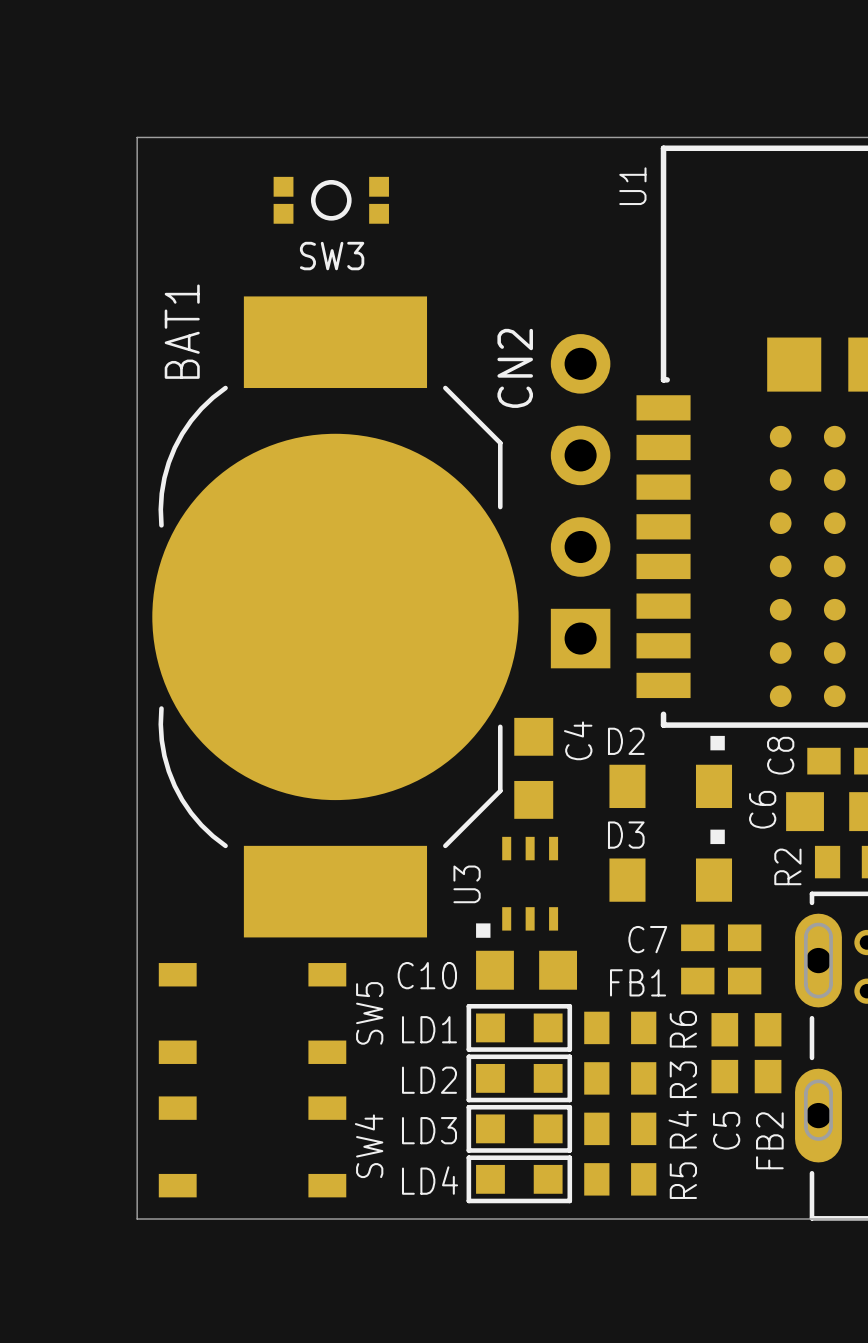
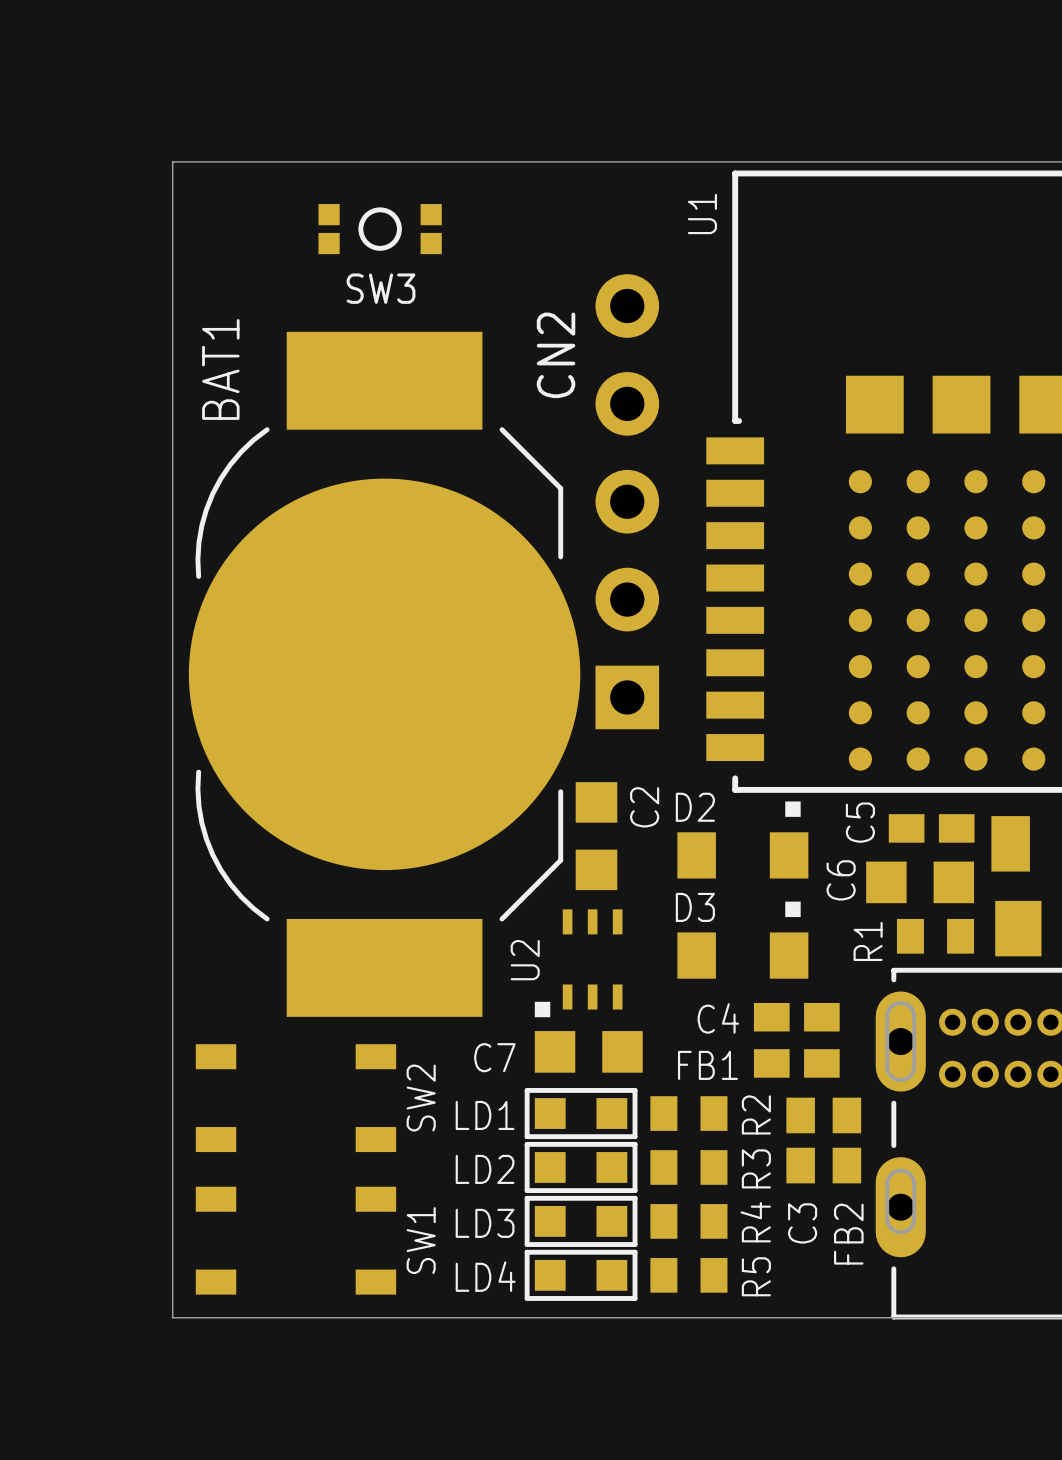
CN2 footprint: [550, 334, 611, 669] -> [595, 274, 660, 730]
C4 name: C4 (578, 740) -> C2 (644, 807)
C8 name: C8 (780, 755) -> C5 (860, 822)
R2 name: R2 (787, 866) -> R1 (868, 941)
U3 name: U3 (467, 884) -> U2 (525, 960)
C7 name: C7 (647, 939) -> C4 (718, 1018)
C10 name: C10 (427, 975) -> C7 (494, 1057)
SW5 name: SW5 (369, 1013) -> SW2 (421, 1098)
R6 name: R6 (683, 1029) -> R2 (756, 1114)
C5 name: C5 (726, 1130) -> C3 (802, 1223)
SW4 name: SW4 (369, 1146) -> SW1 (421, 1240)

